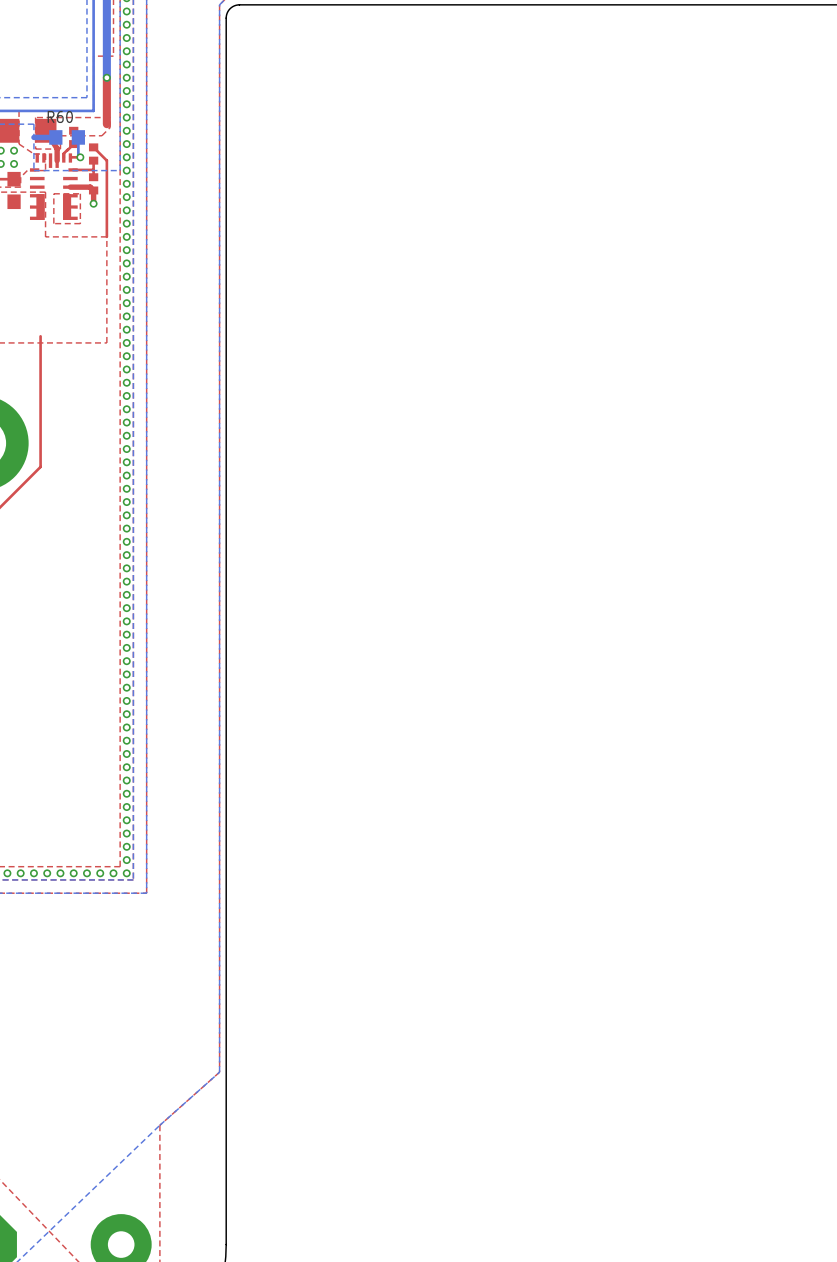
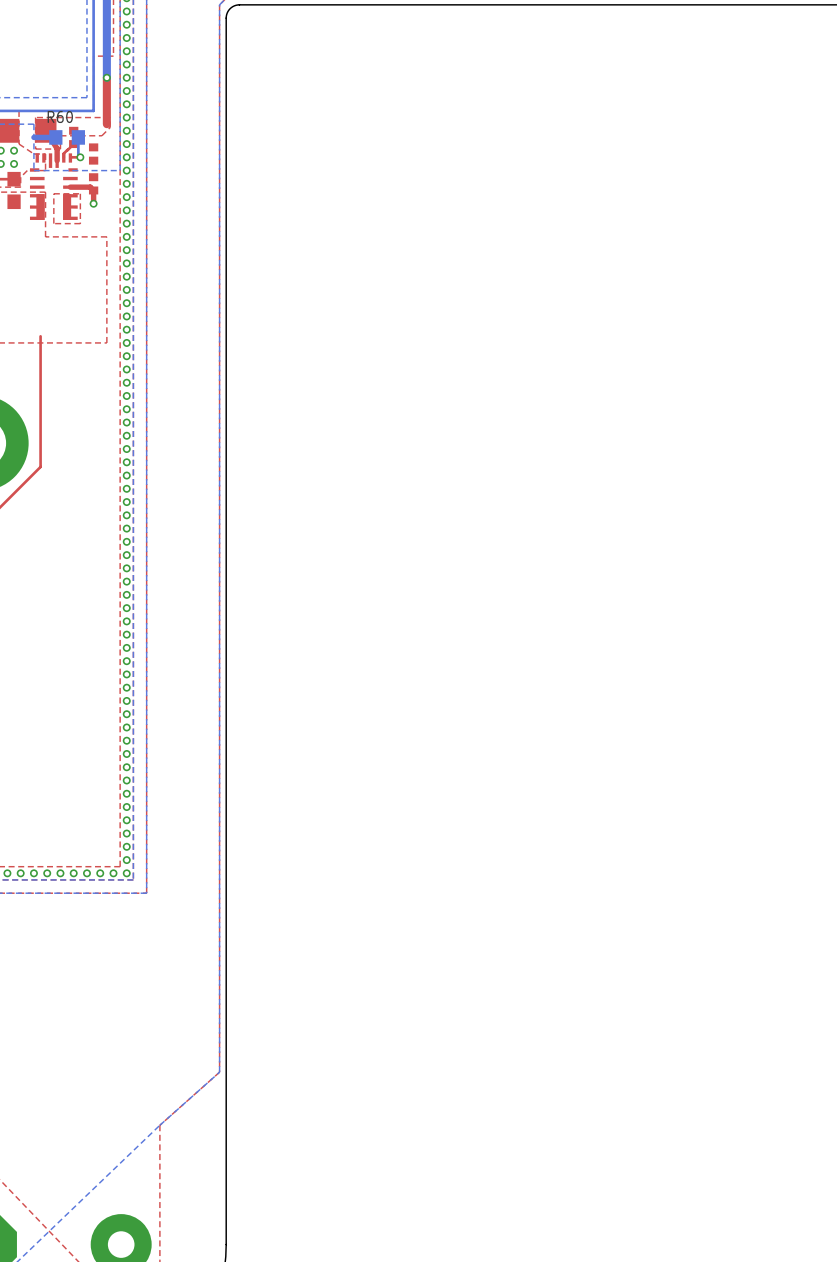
top track: (93, 147) (106, 160) (106, 236) -> none
top track: (93, 160) (93, 177) -> none
top track: (73, 169) (93, 170) -> none

